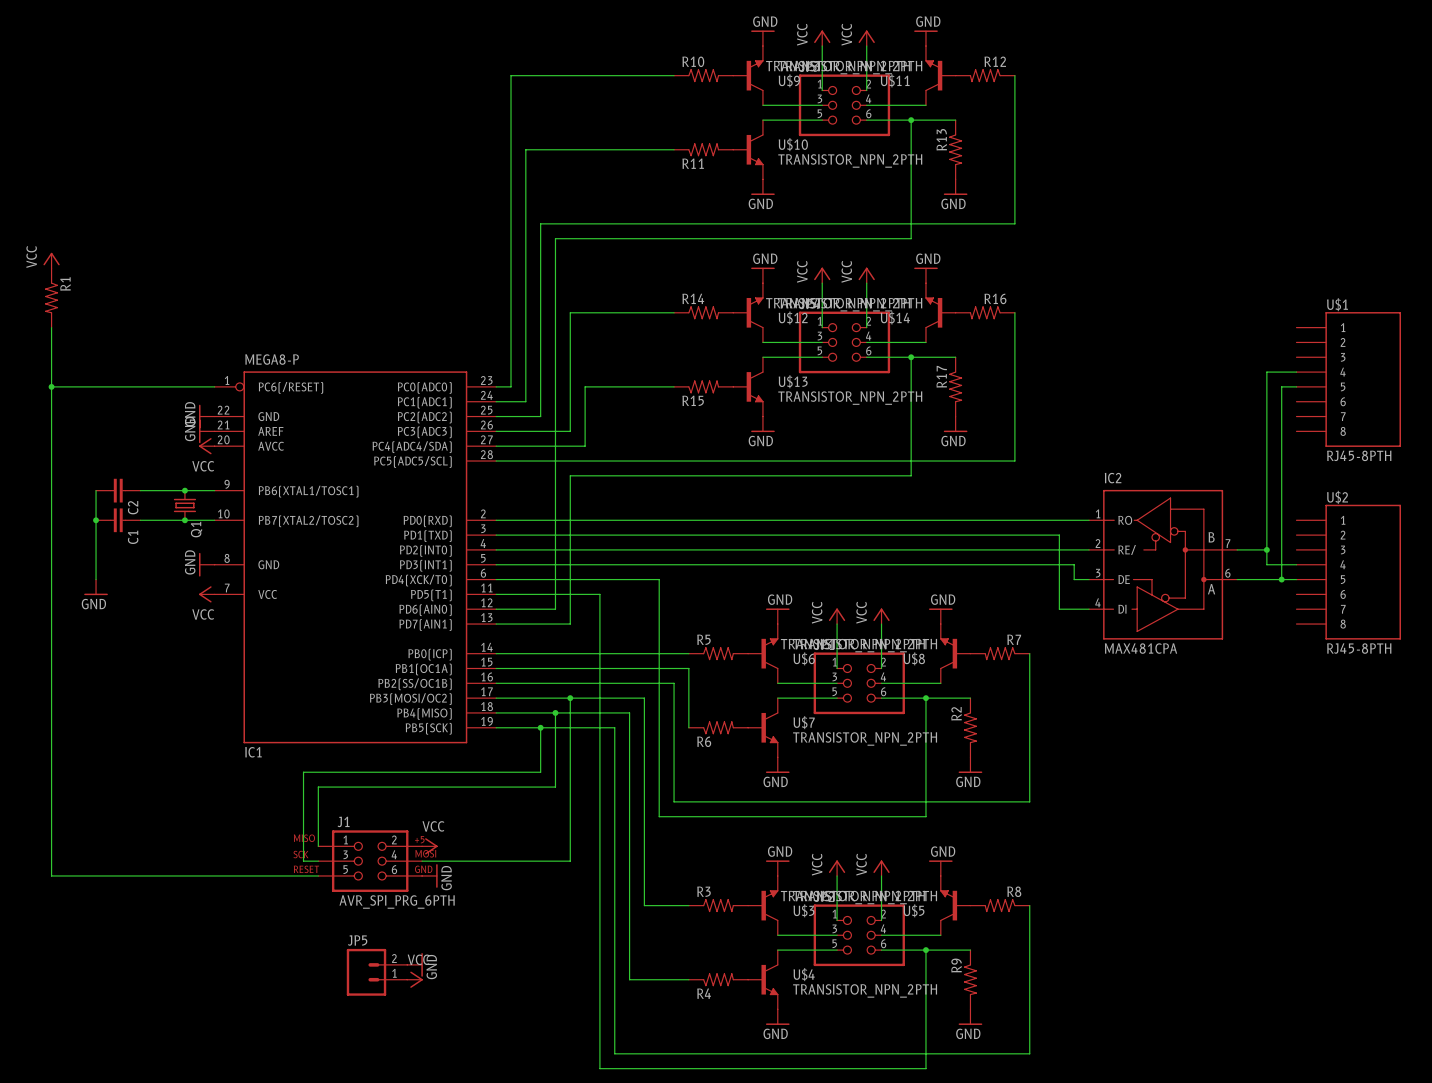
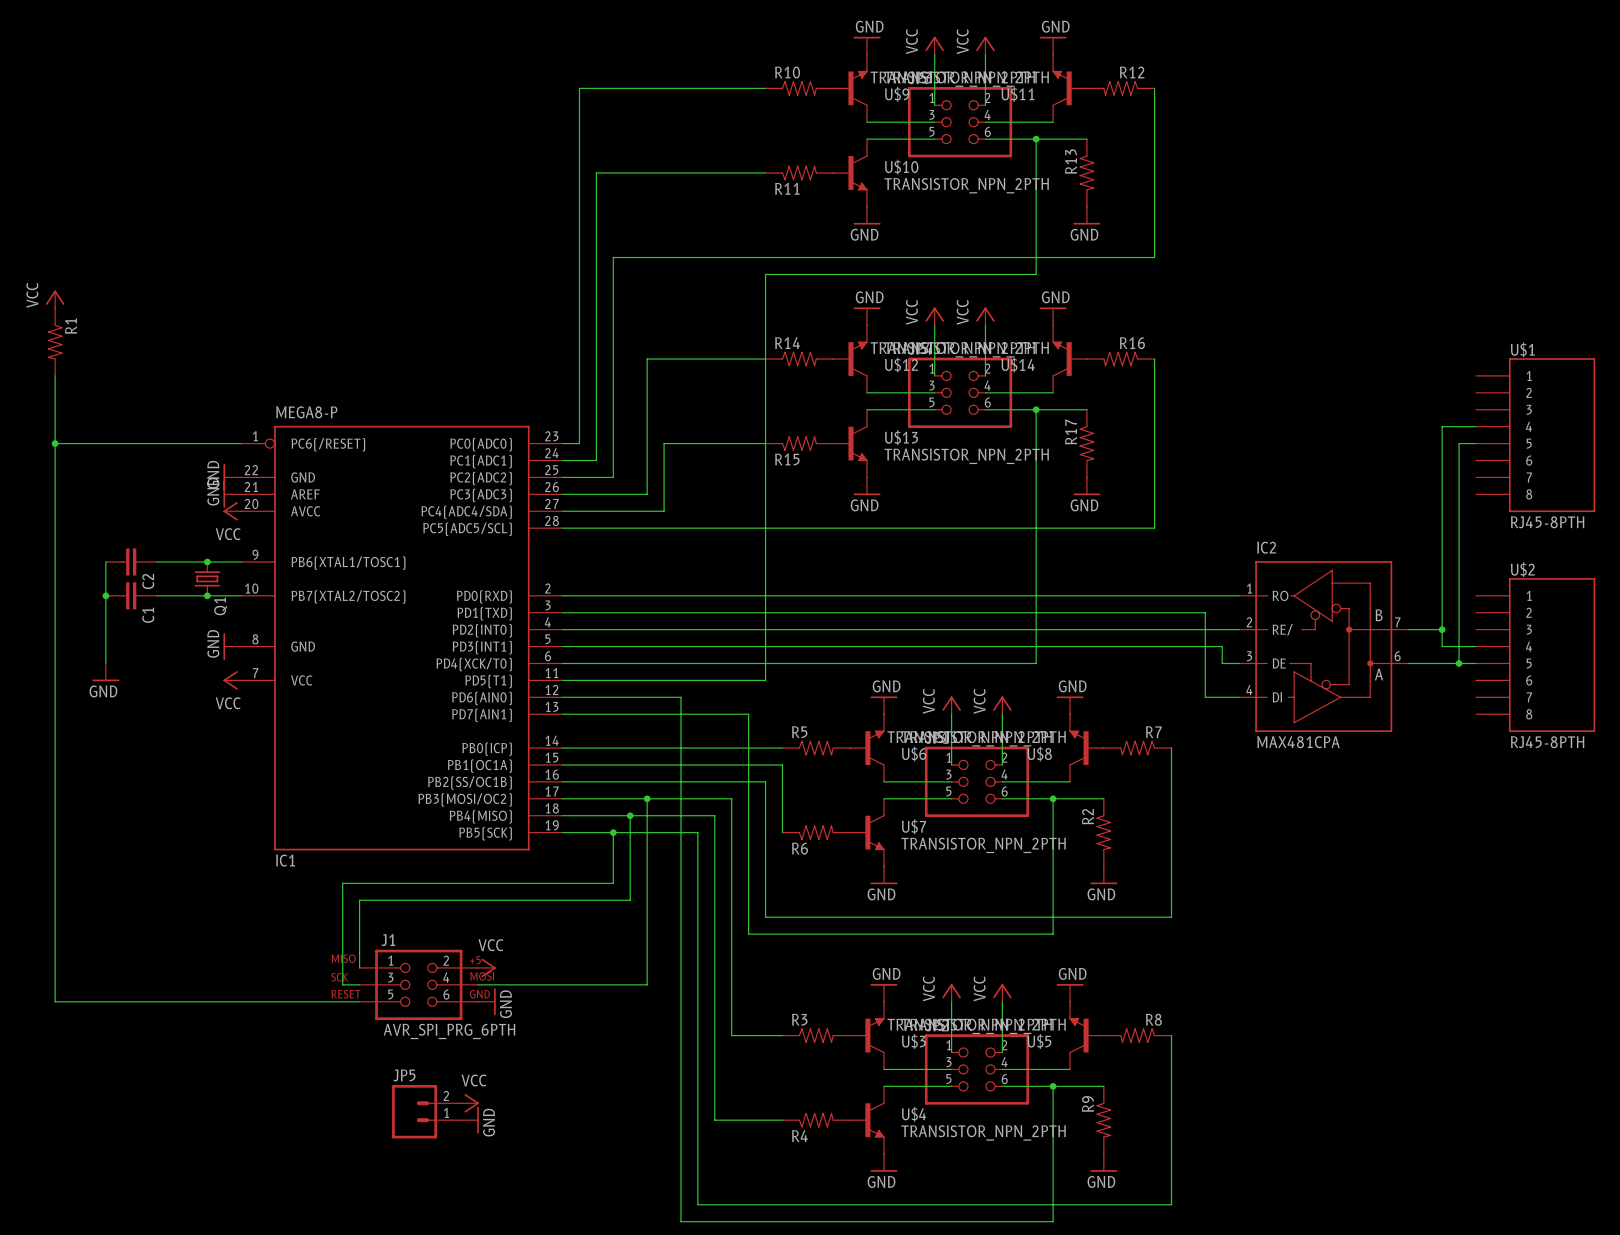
wire: (674, 238) (555, 238) (555, 609) -> (765, 274) (765, 680) (680, 680)
wire: (911, 475) (570, 475) (570, 624) -> (1036, 545) (1036, 663) (748, 663)
wire: (659, 579) (659, 624) -> (647, 714) (748, 714)
wire: (599, 594) (599, 609) -> (630, 697) (680, 697)
power symbol: GND (415, 964) -> VCC (469, 1103)
power symbol: VCC (415, 979) -> GND (469, 1120)

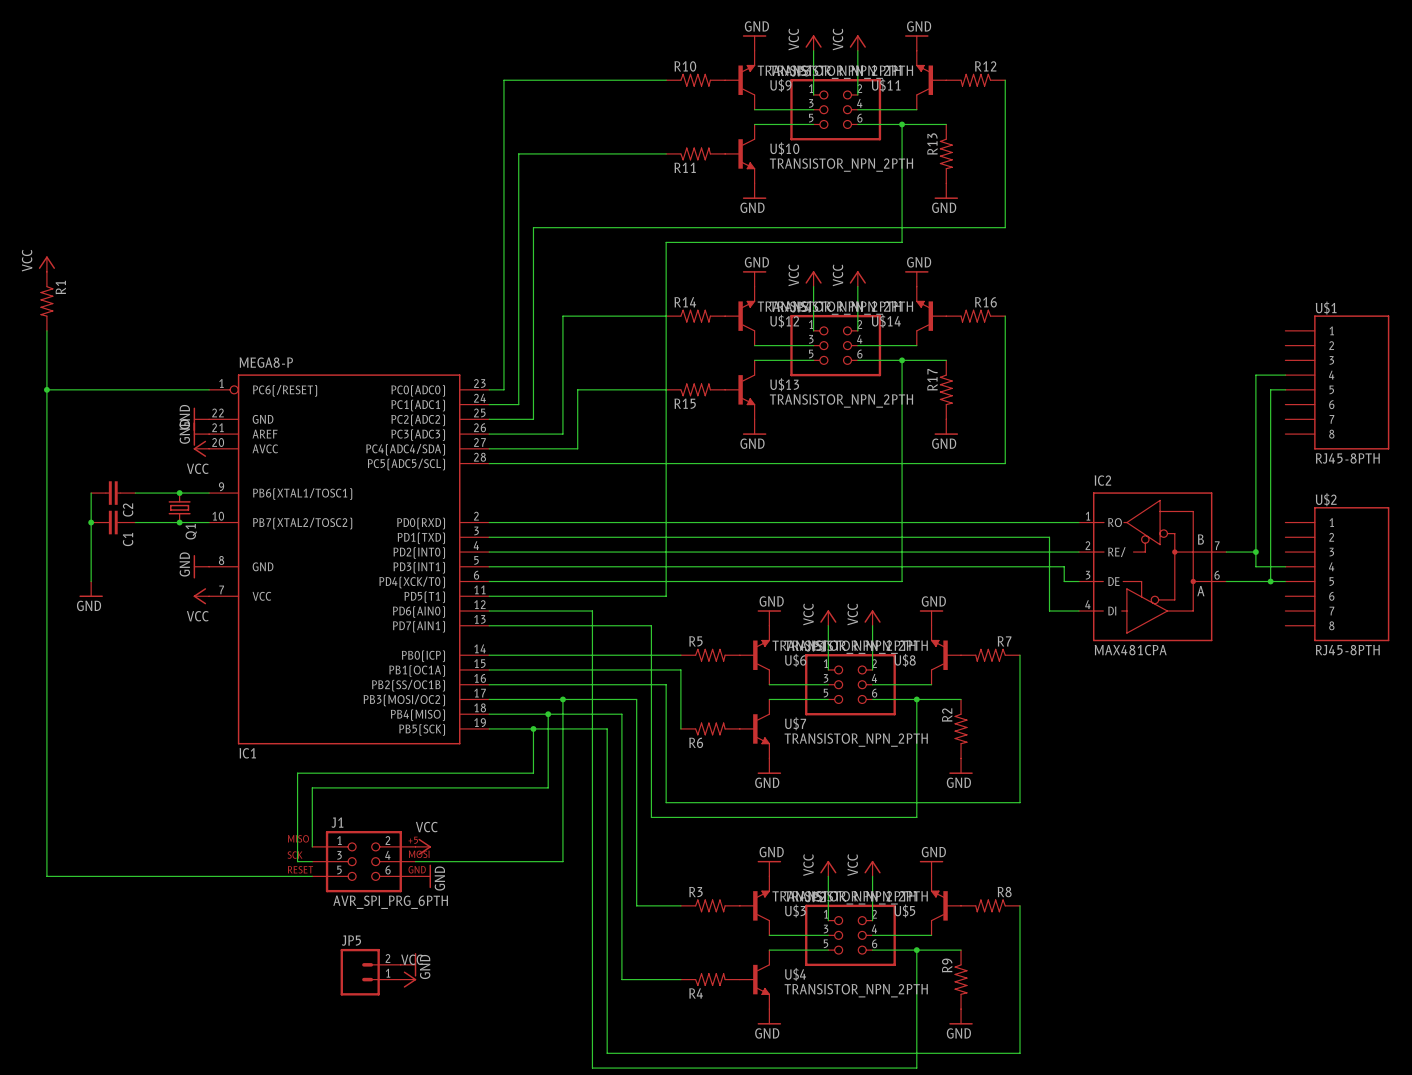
power symbol: VCC (469, 1103) -> GND (408, 964)
power symbol: GND (469, 1120) -> VCC (408, 979)

